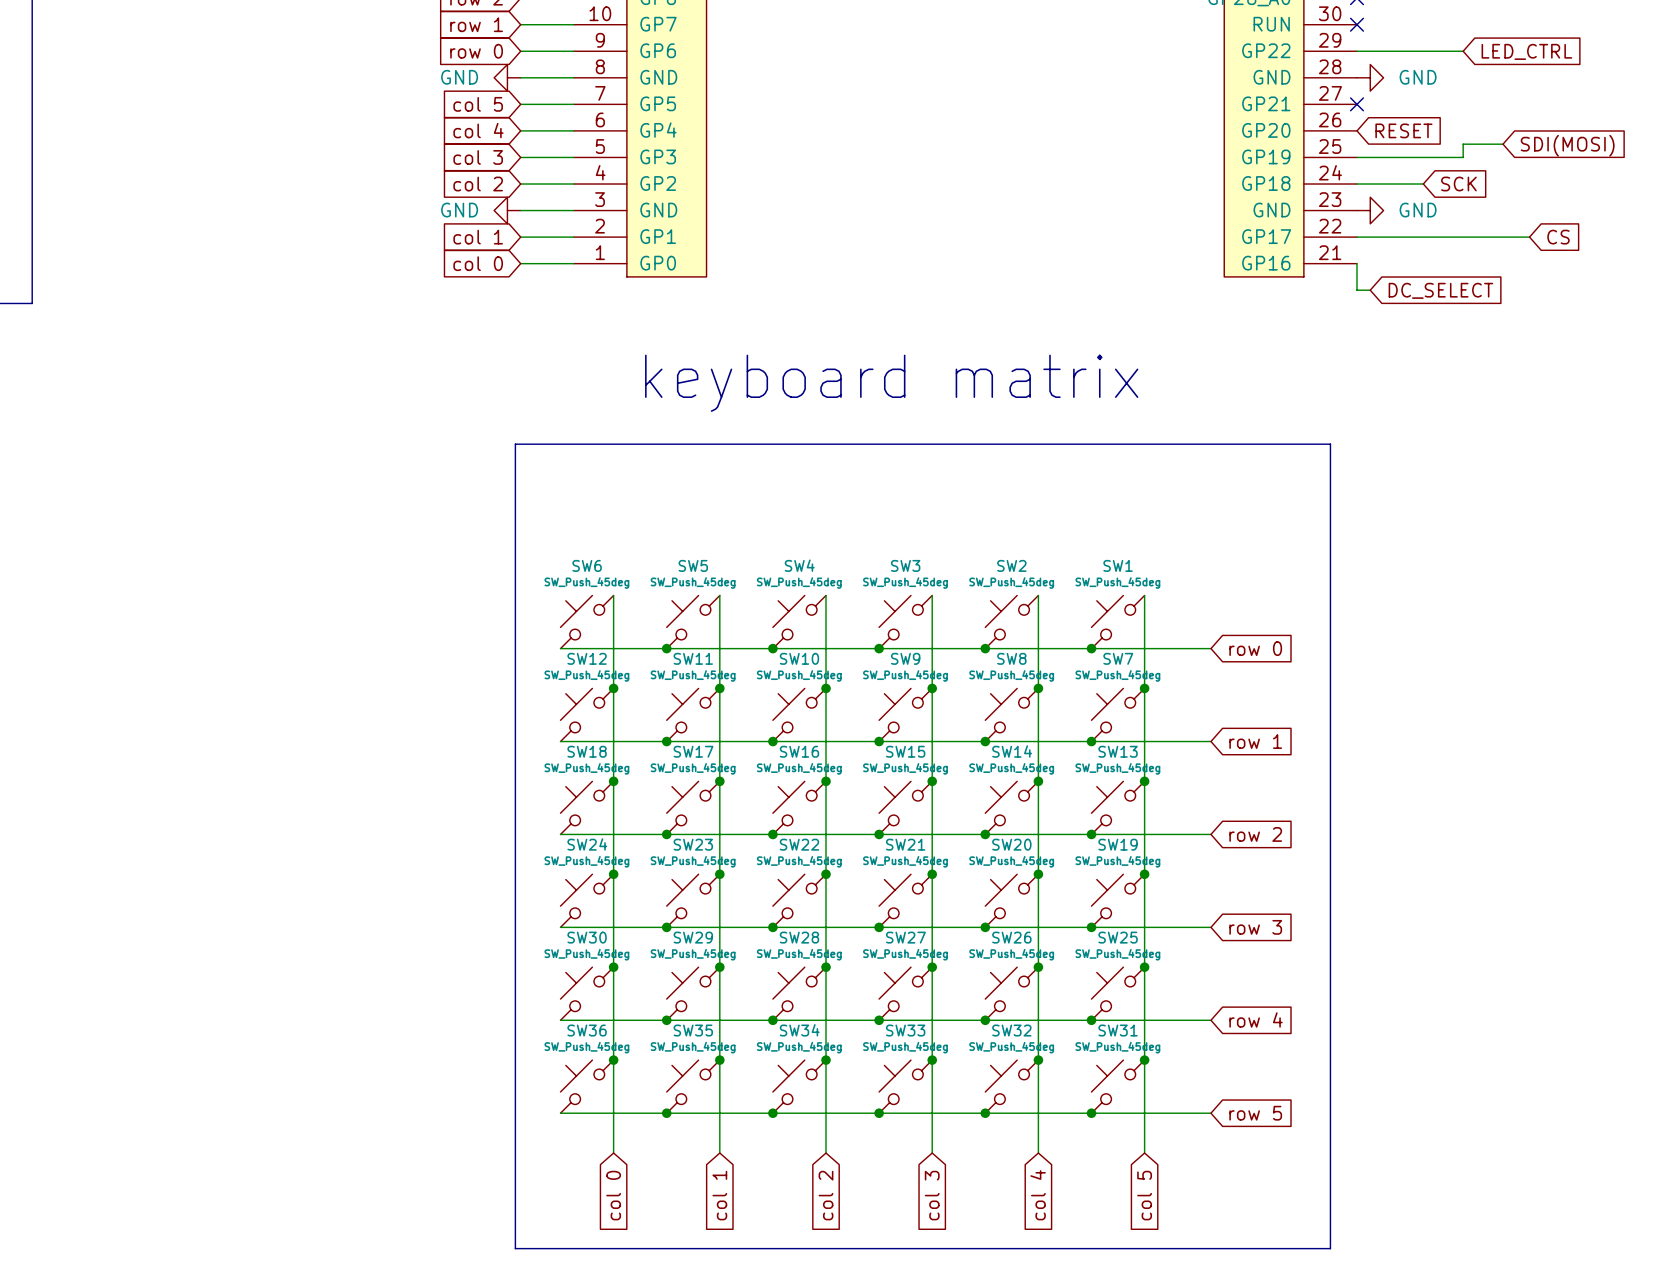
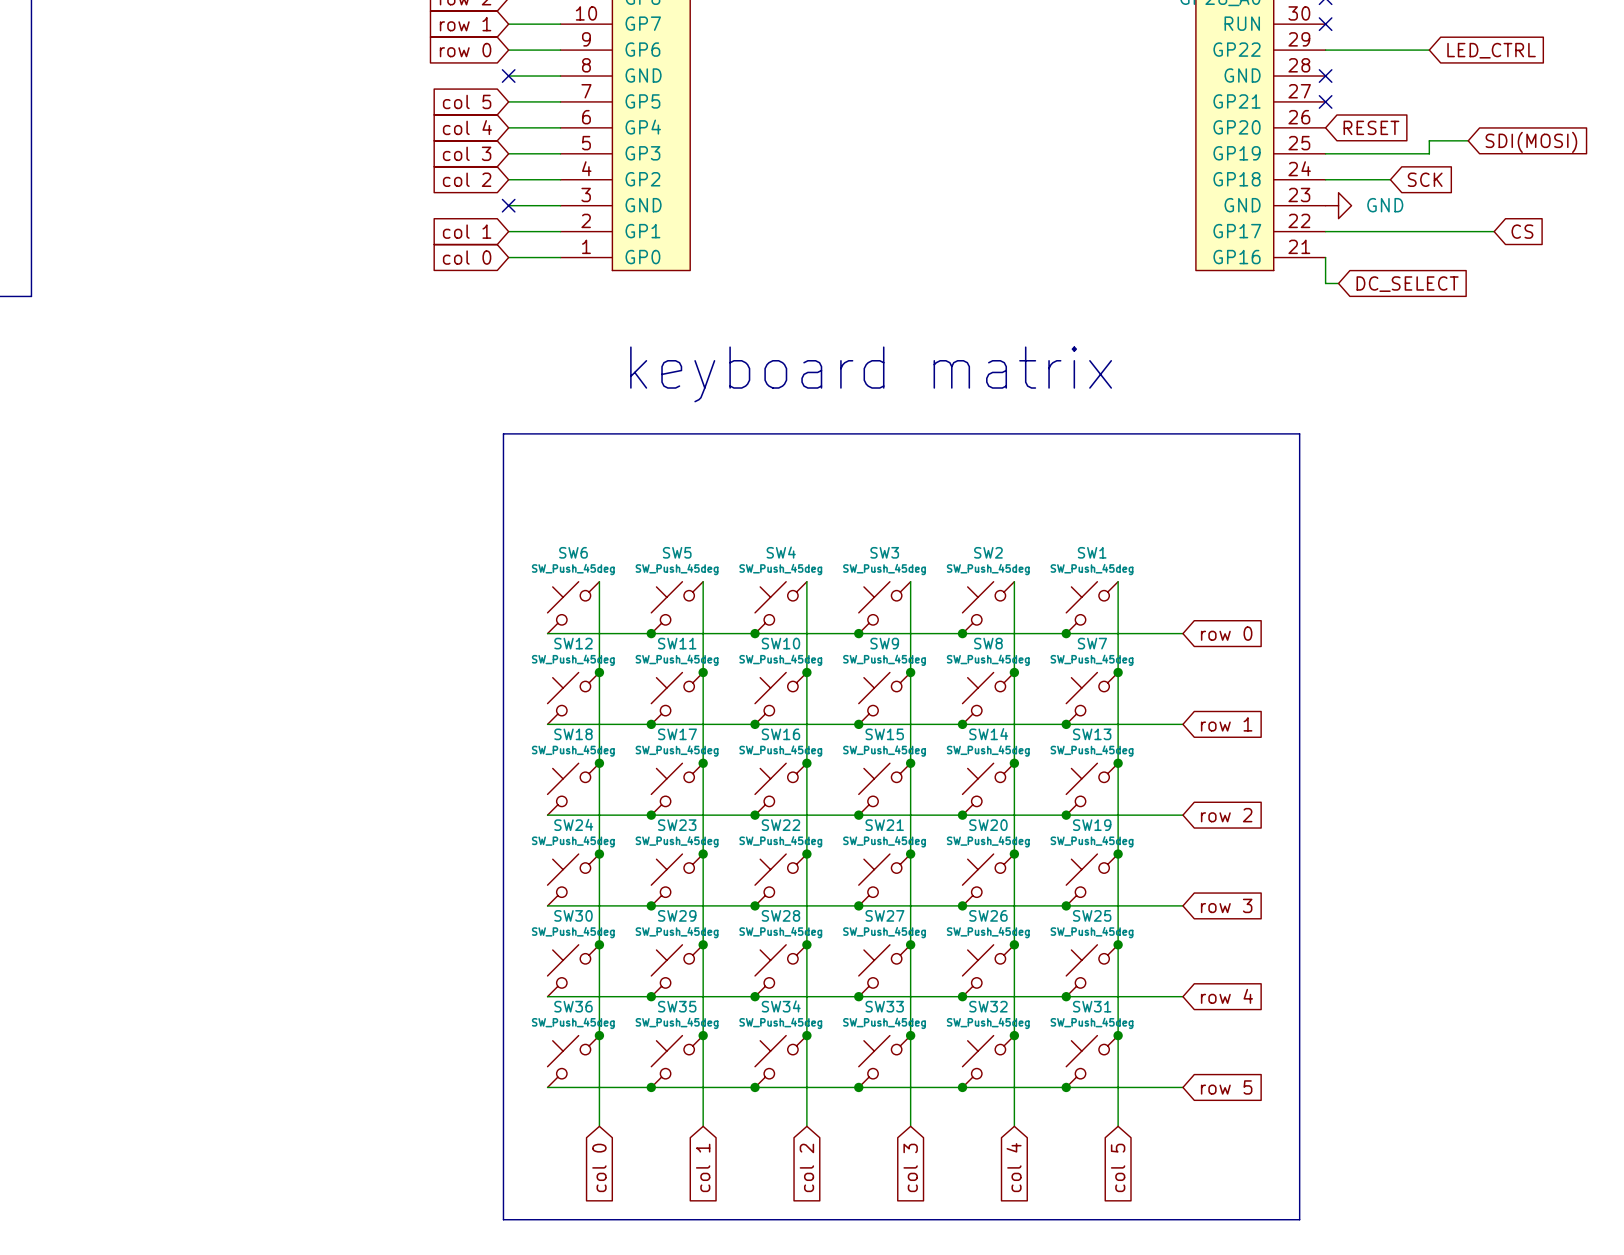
power symbol: GND (507, 77) -> none
no-connect mark: none -> (508, 76)
no-connect mark: none -> (1325, 76)
power symbol: GND (1370, 77) -> none
power symbol: GND (507, 210) -> none
no-connect mark: none -> (508, 205)

